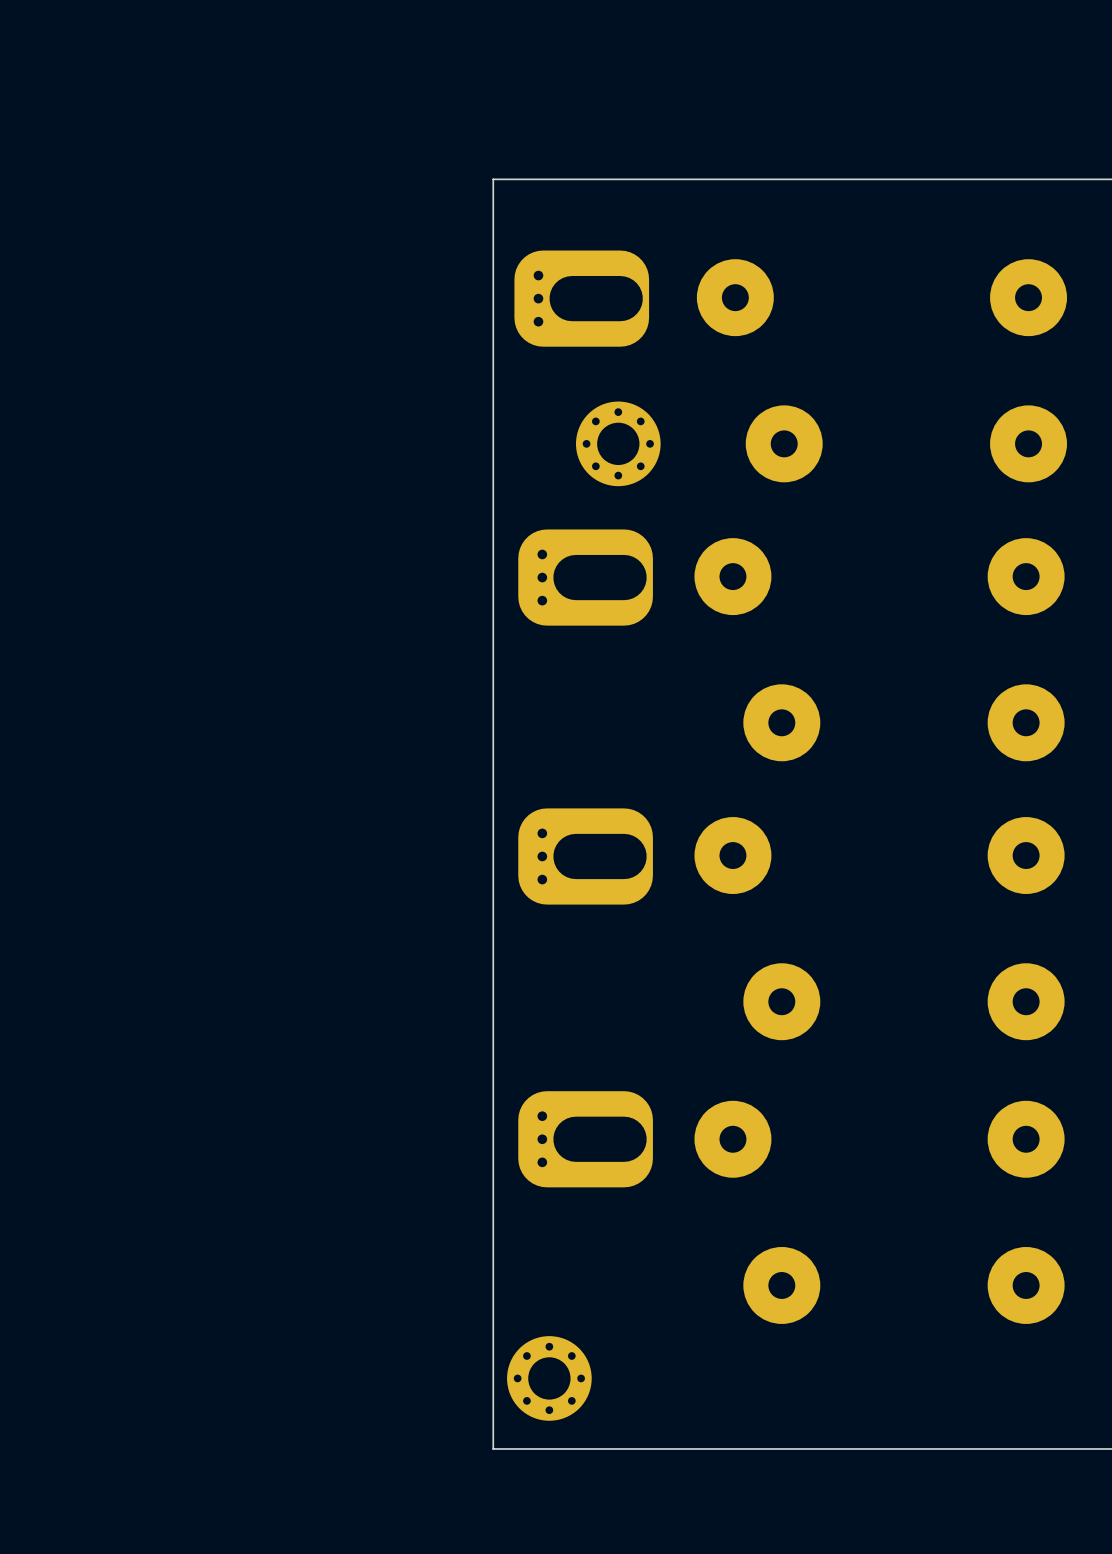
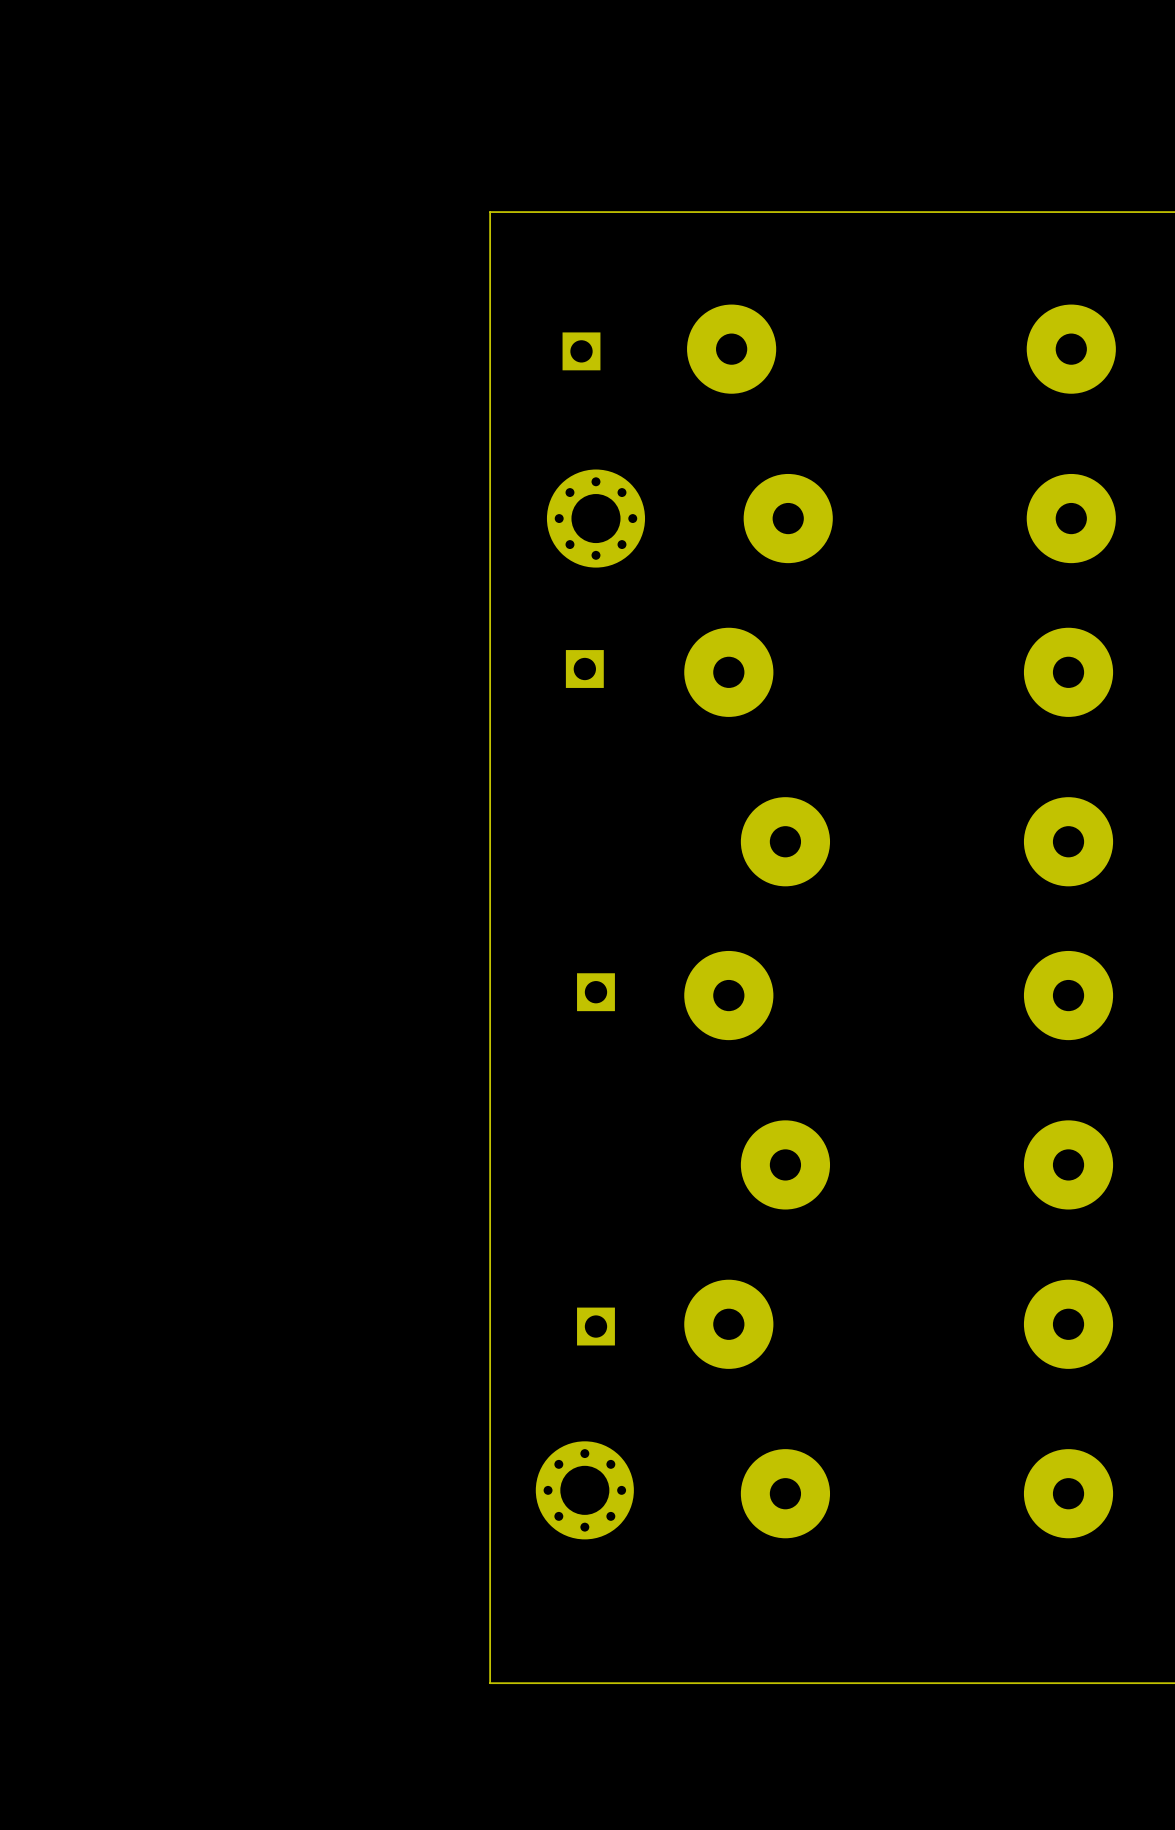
board edge: (526, 179) (493, 179) (493, 1448) (526, 1448) -> (490, 212) (490, 1683)
part: (581, 298) -> none
part: none -> (581, 351)
part: none -> (584, 669)
part: (585, 577) -> none
part: none -> (595, 992)
part: (585, 856) -> none
part: (585, 1139) -> none
part: none -> (595, 1326)
part position: (549, 1378) -> (584, 1490)

